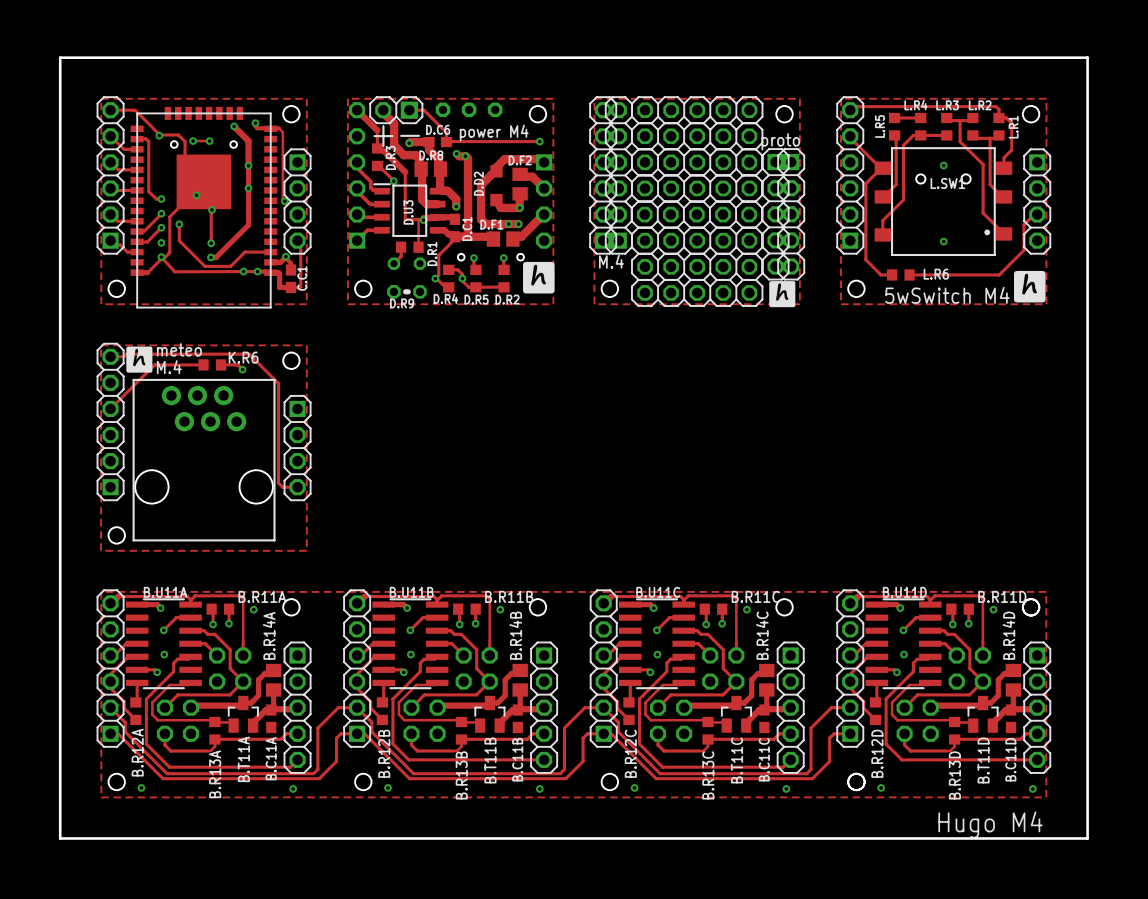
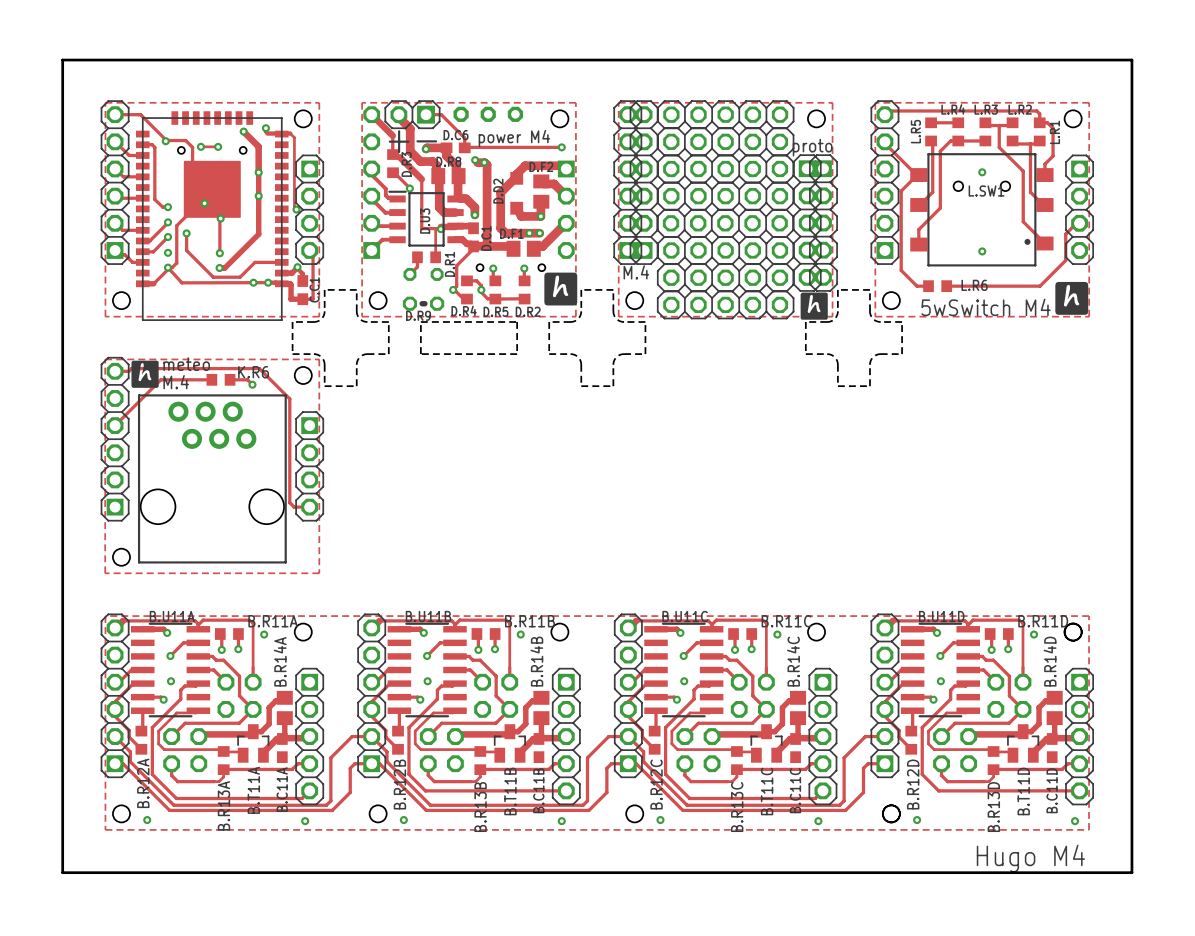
board edge: none -> (324, 289) (356, 289) (356, 312) (359, 318) (366, 321) (388, 322) (388, 354) (366, 354) (359, 357) (356, 363) (356, 386) (324, 386) (324, 363) (321, 357) (315, 354) (292, 354) (292, 322) (315, 321) (321, 318) (324, 312) (324, 289)
board edge: none -> (581, 289) (613, 289) (613, 312) (616, 318) (622, 321) (645, 322) (645, 354) (622, 354) (616, 357) (613, 363) (613, 386) (581, 386) (581, 363) (578, 357) (571, 354) (549, 354) (549, 322) (571, 321) (578, 318) (581, 312) (581, 289)
board edge: none -> (837, 289) (869, 289) (870, 312) (873, 318) (879, 321) (902, 322) (902, 354) (879, 354) (873, 357) (870, 363) (869, 386) (837, 386) (837, 363) (834, 357) (828, 354) (805, 354) (805, 322) (828, 321) (834, 318) (837, 312) (837, 289)
board edge: none -> (420, 322) (517, 322) (517, 354) (420, 354) (420, 322)

